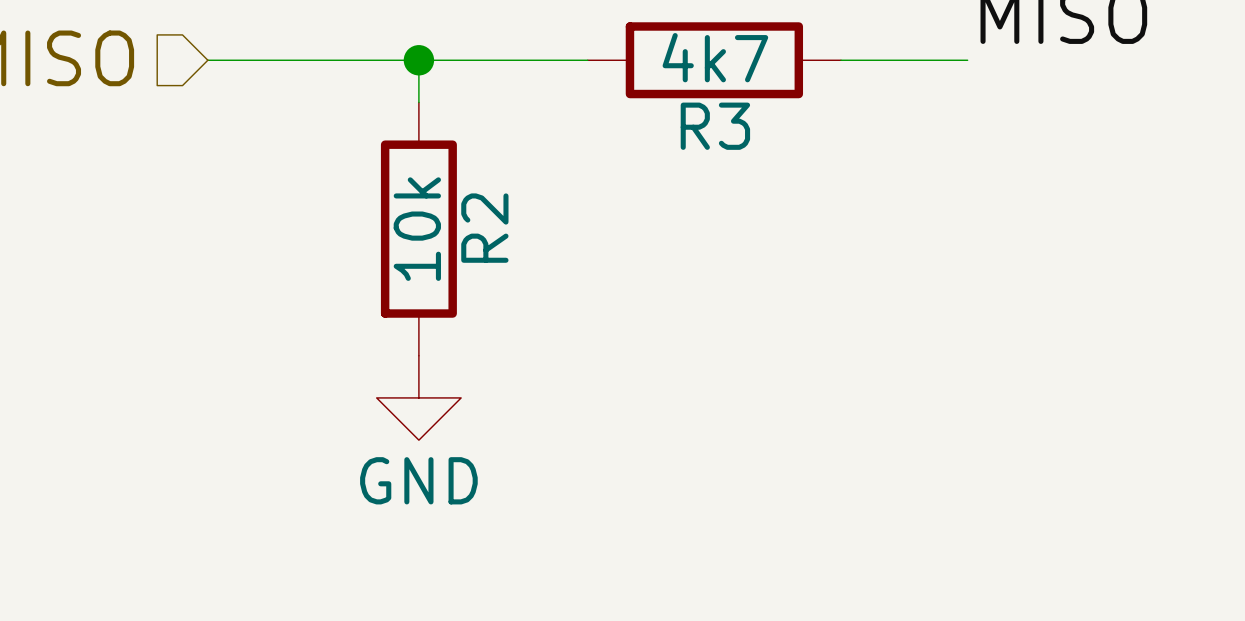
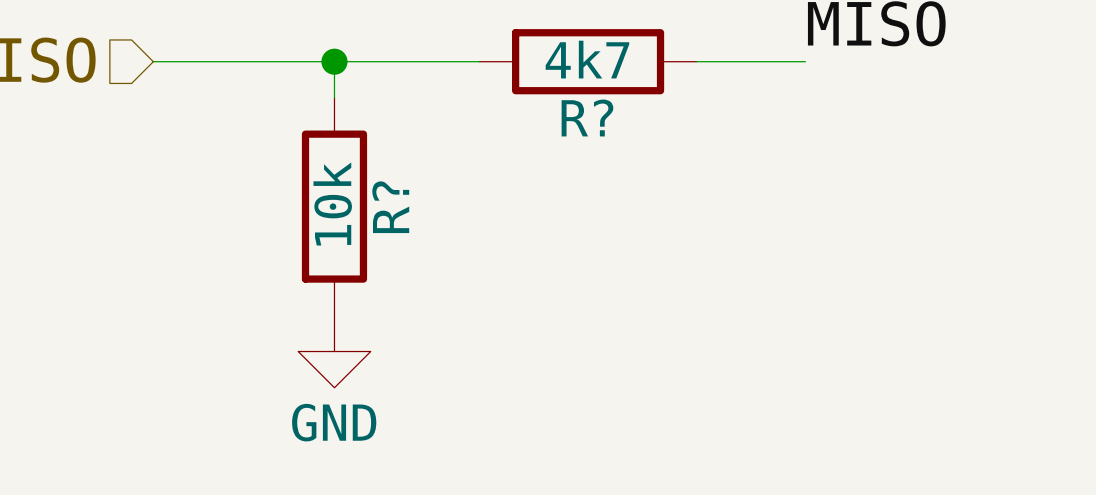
R3 name: R3 (715, 126) -> R? (587, 117)
R2 name: R2 (484, 228) -> R? (390, 207)

